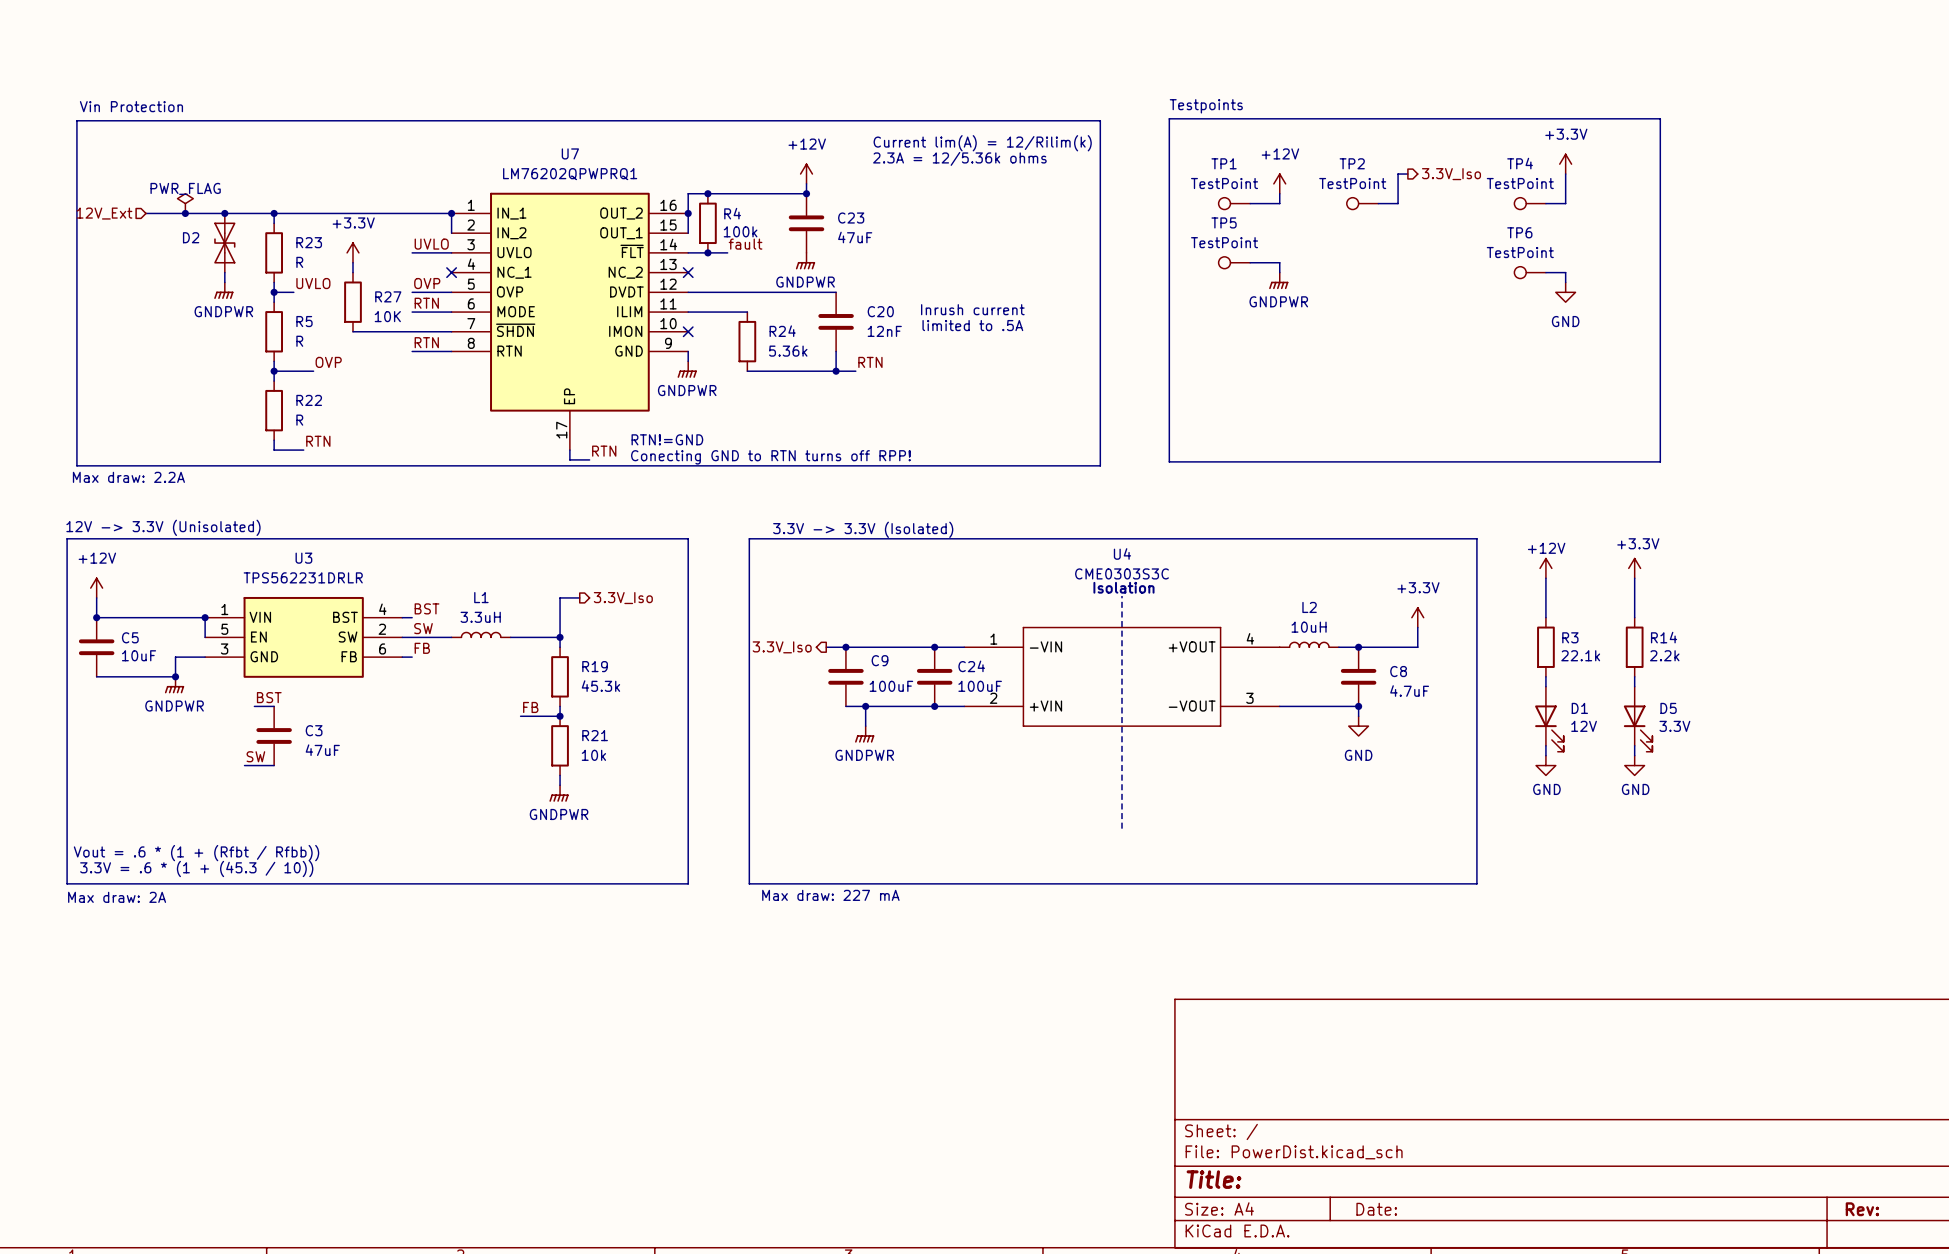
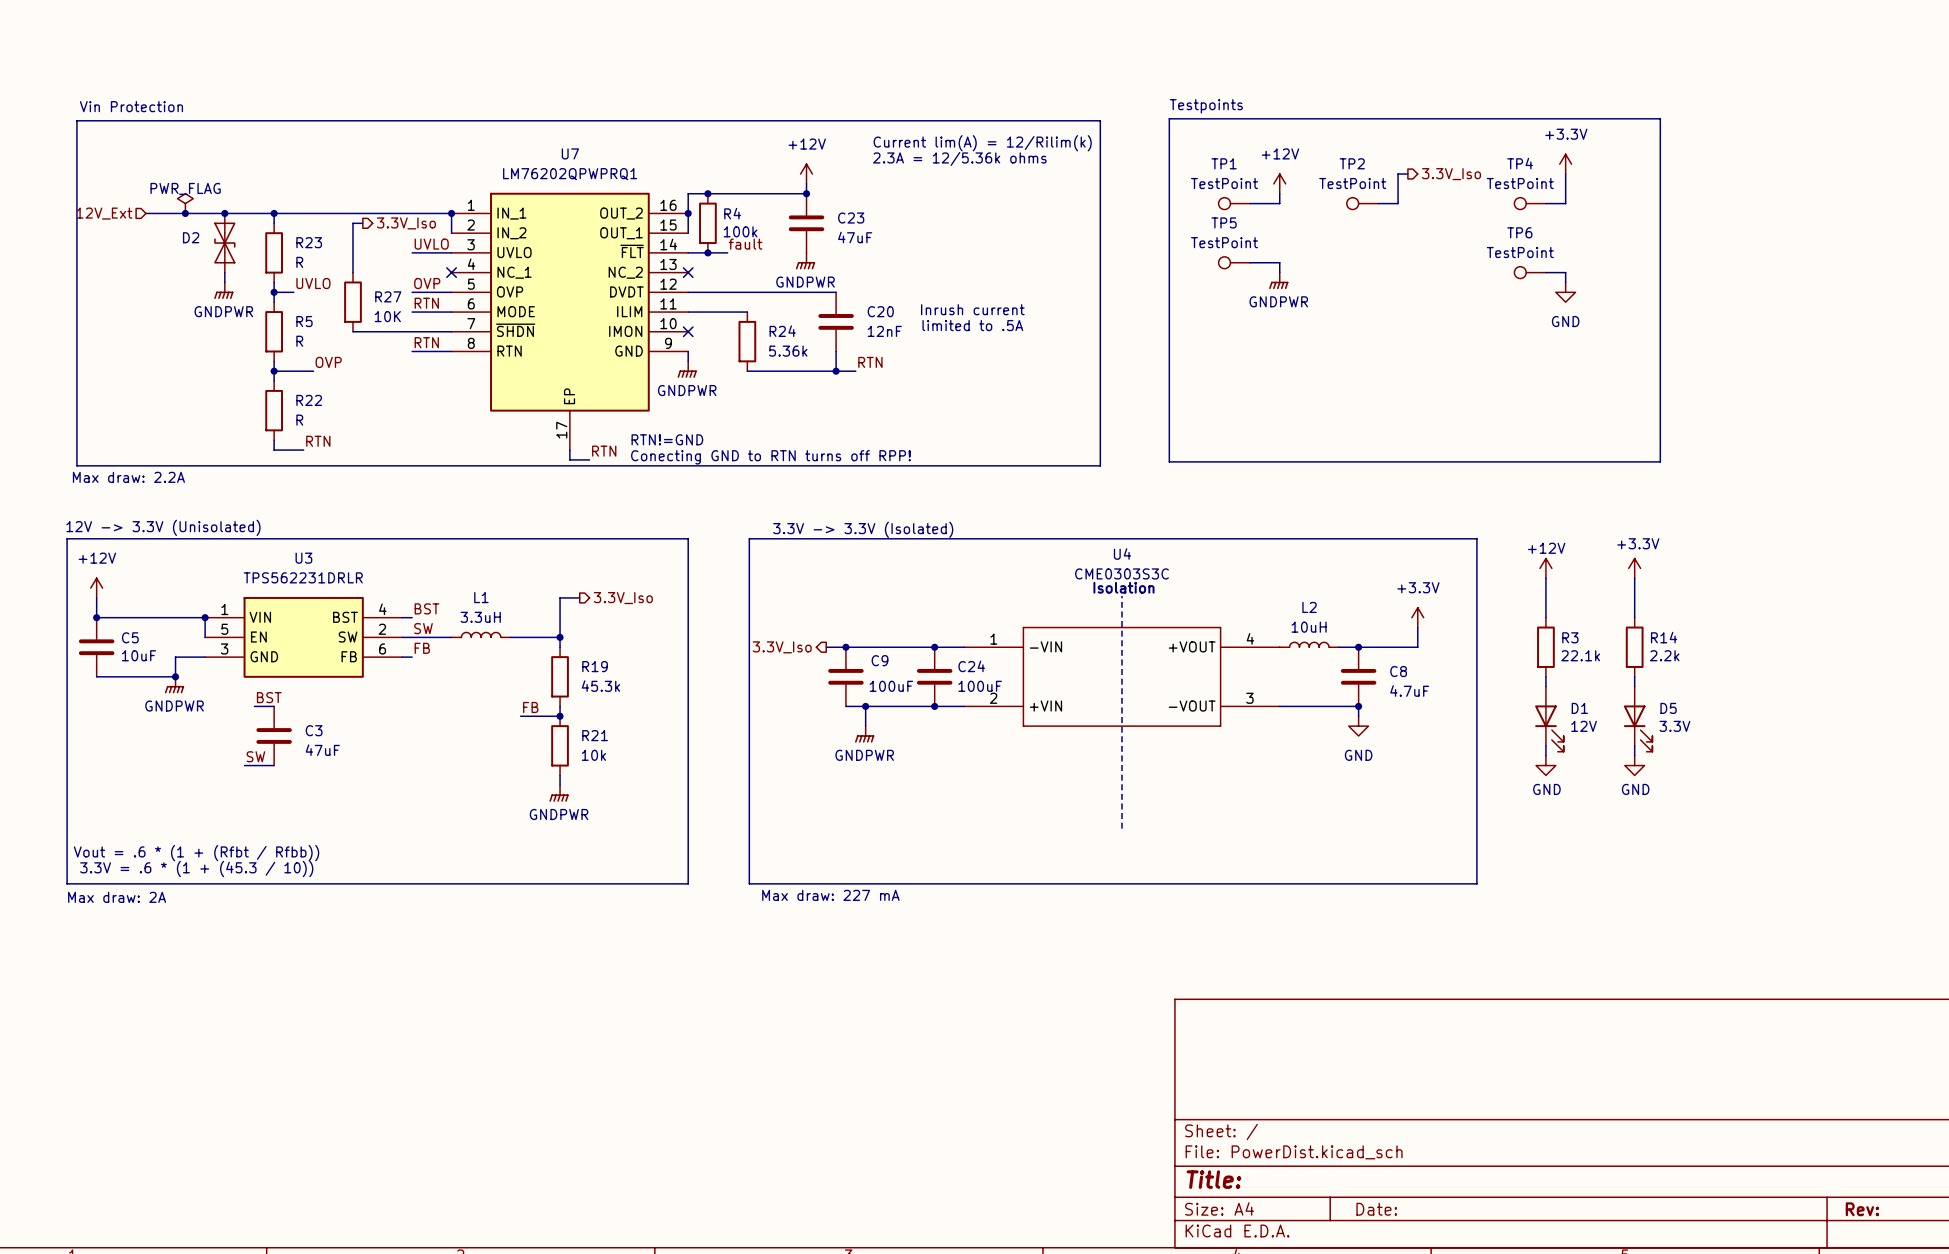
wire: none -> (362, 223) (352, 223) (352, 262)
hierarchical label: none -> 3.3V_Iso (406, 223)
power symbol: +3.3V (352, 252) -> none

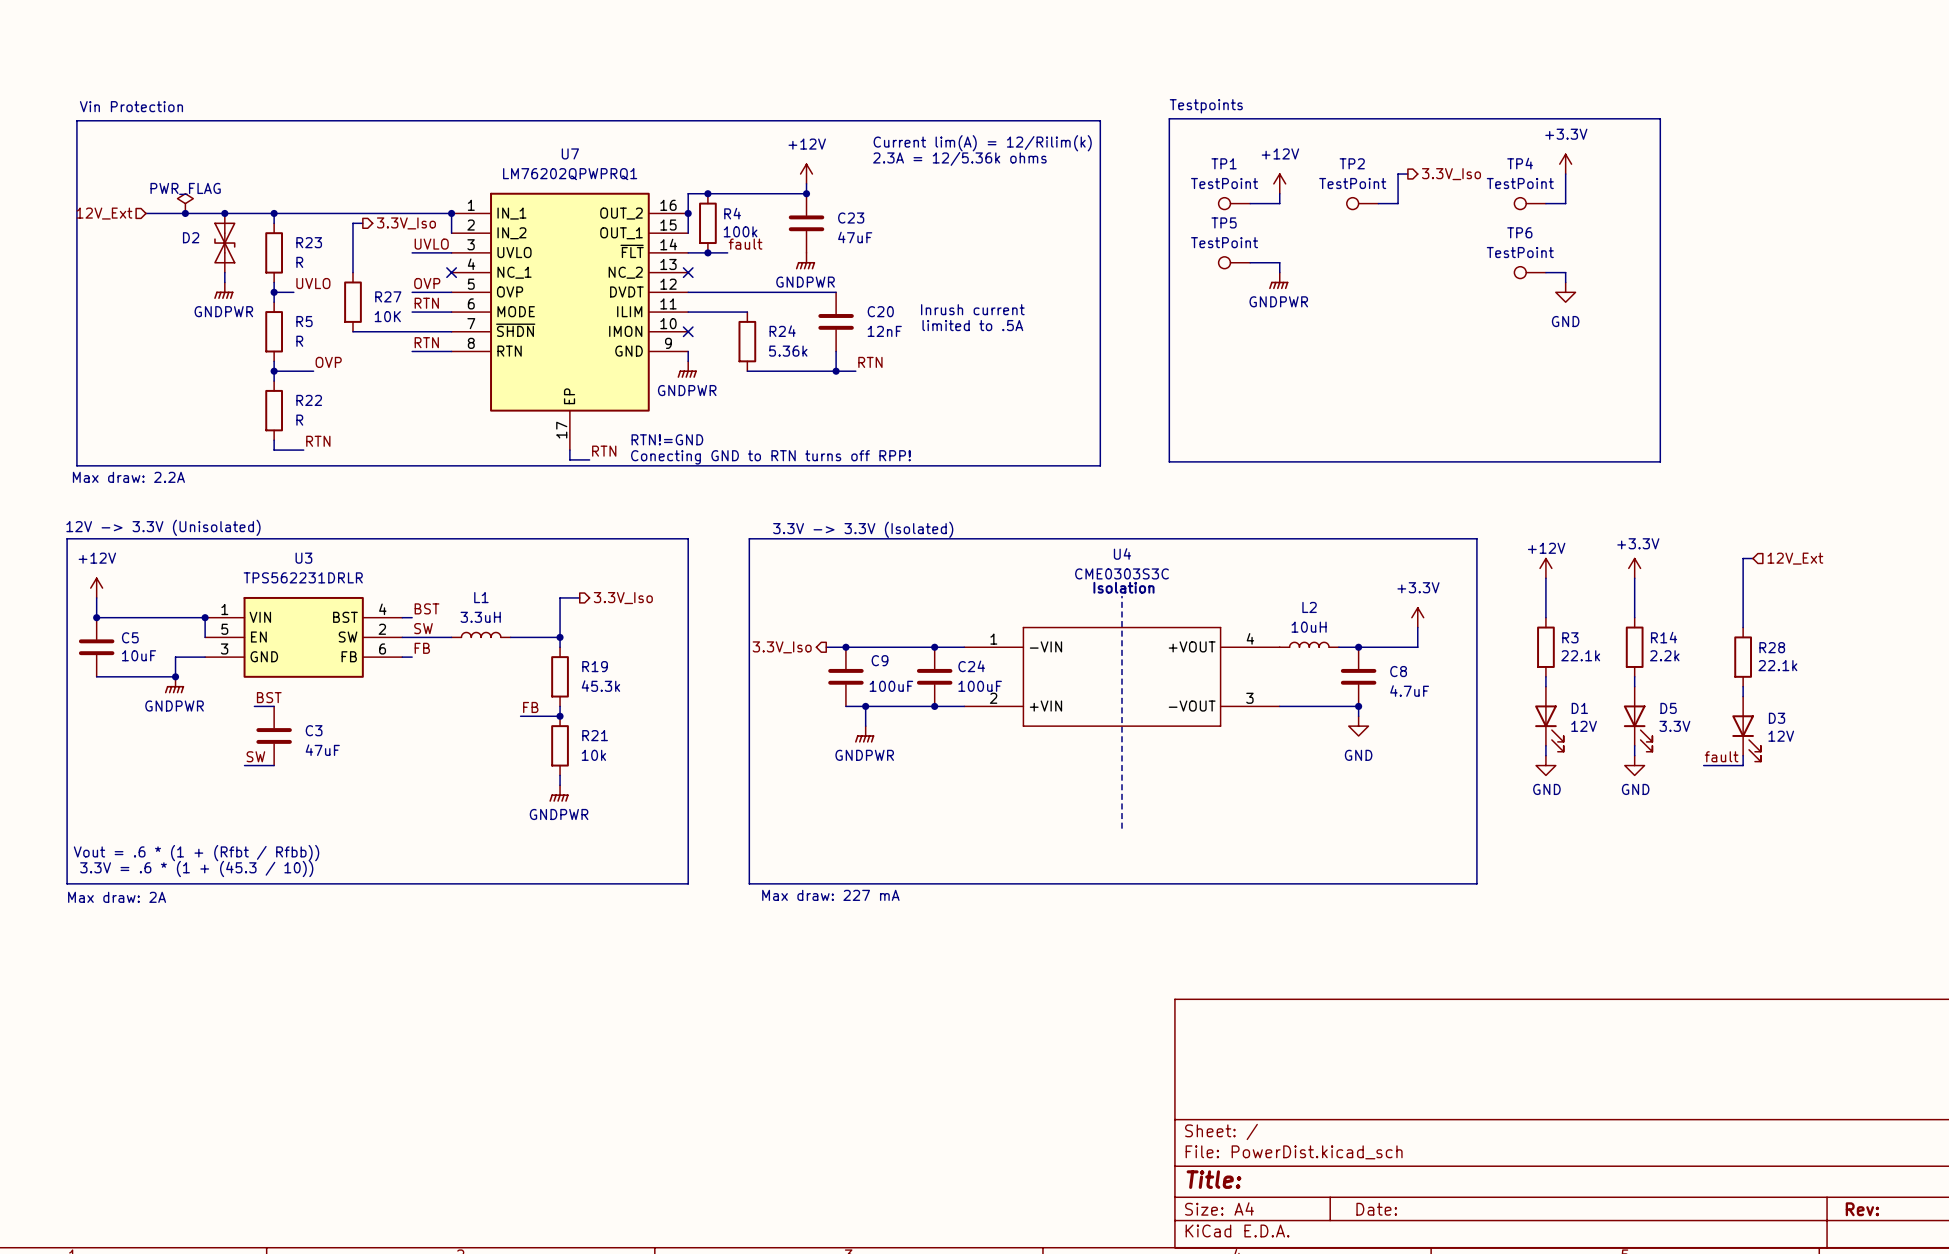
wire: none -> (1752, 558) (1743, 558) (1743, 627)
hierarchical label: none -> 12V_Ext (1795, 558)
R28: none -> 22.1k (1743, 657)
wire: none -> (1743, 686) (1743, 696)
D3: none -> 12V (1746, 729)
wire: none -> (1743, 755) (1743, 765) (1703, 765)
label: none -> fault (1721, 756)

